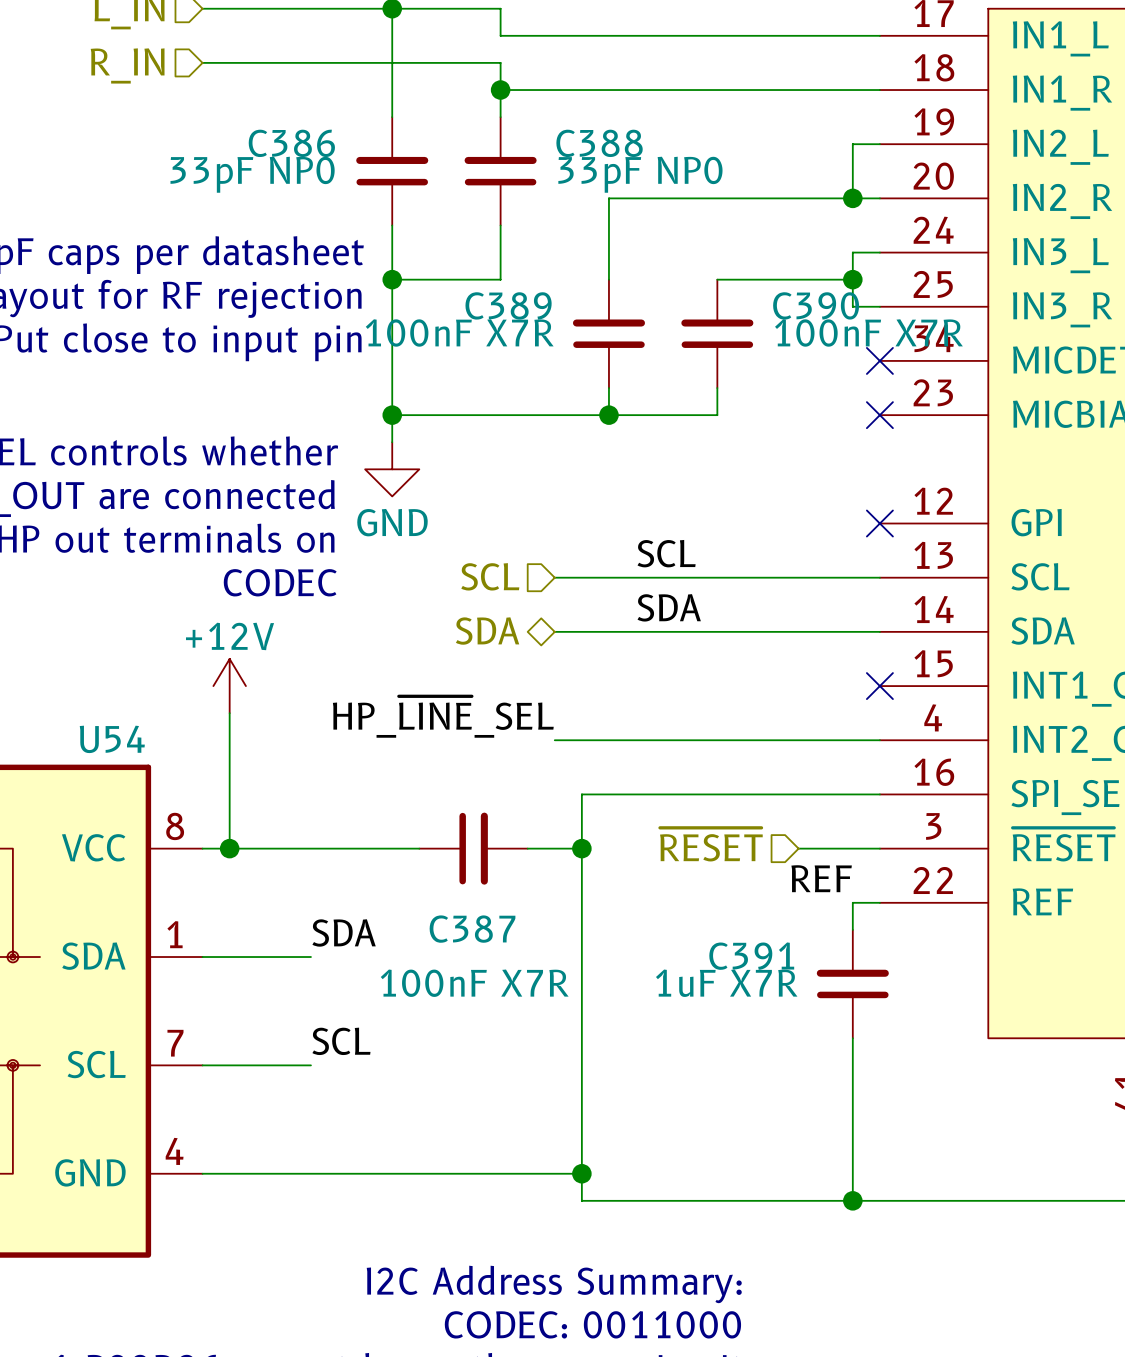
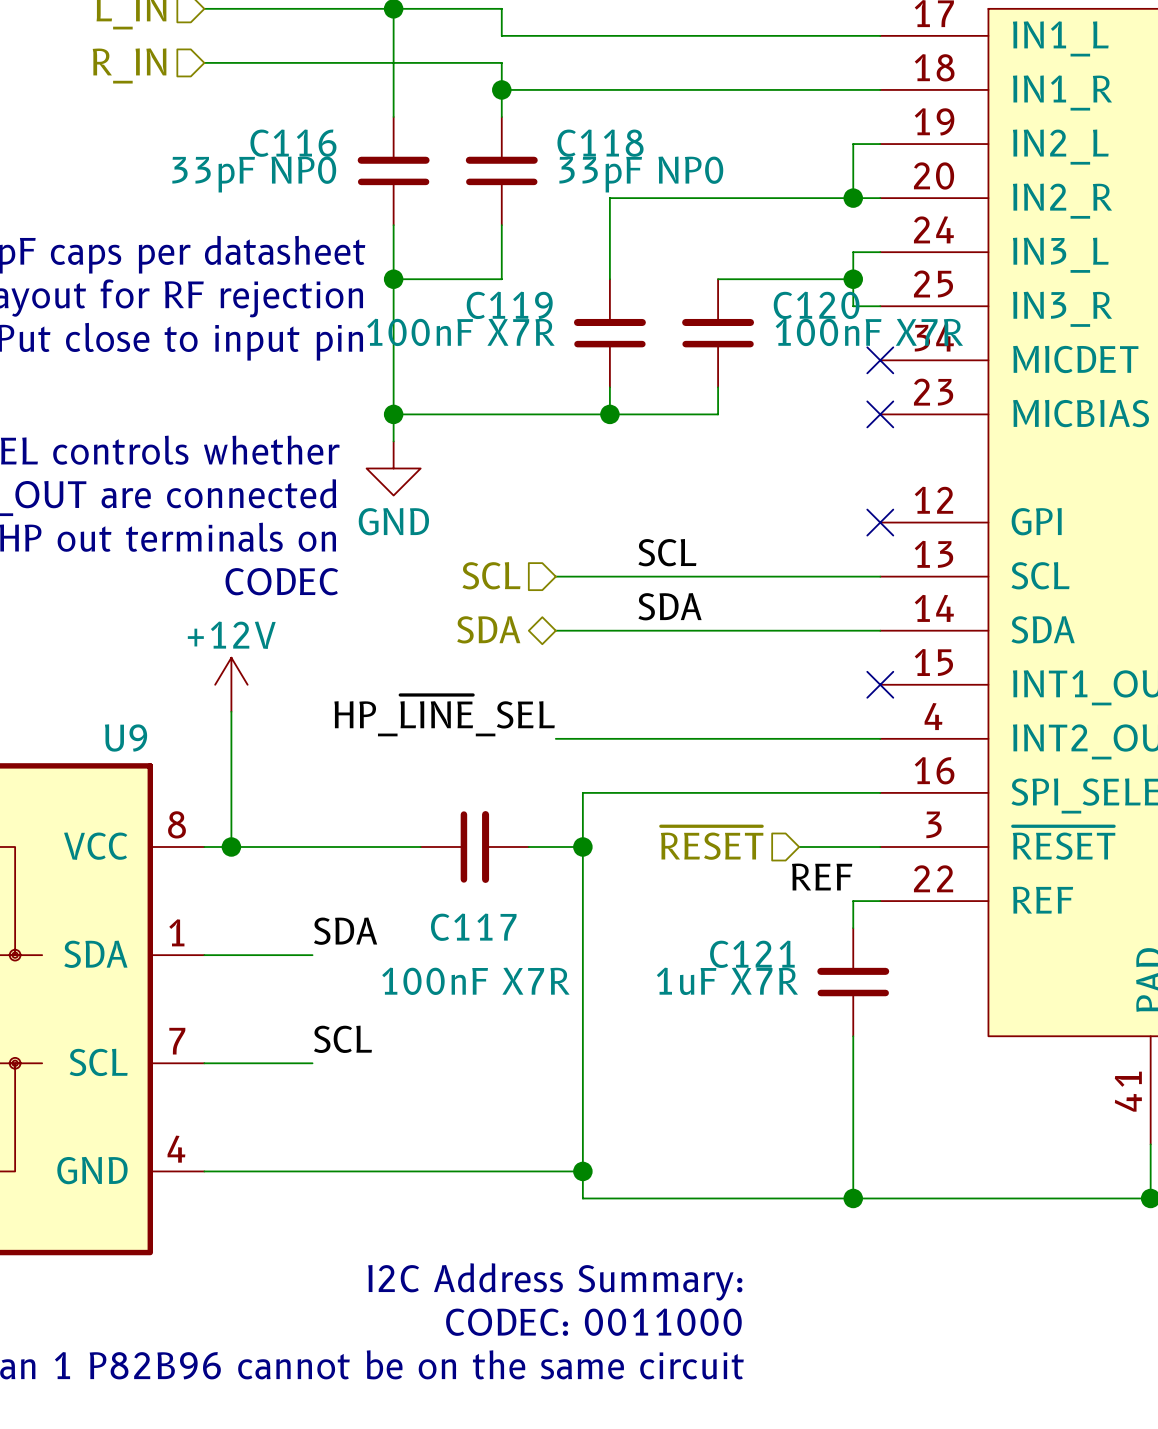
C386 name: C386 (291, 143) -> C116 (293, 143)
C388 name: C388 (599, 143) -> C118 (600, 143)
C389 name: C389 (508, 305) -> C119 (509, 305)
C390 name: C390 (816, 305) -> C120 (816, 305)
U54 name: U54 (112, 739) -> U9 (126, 737)
C387 name: C387 (472, 929) -> C117 (473, 927)
C391 name: C391 (751, 956) -> C121 (752, 954)

